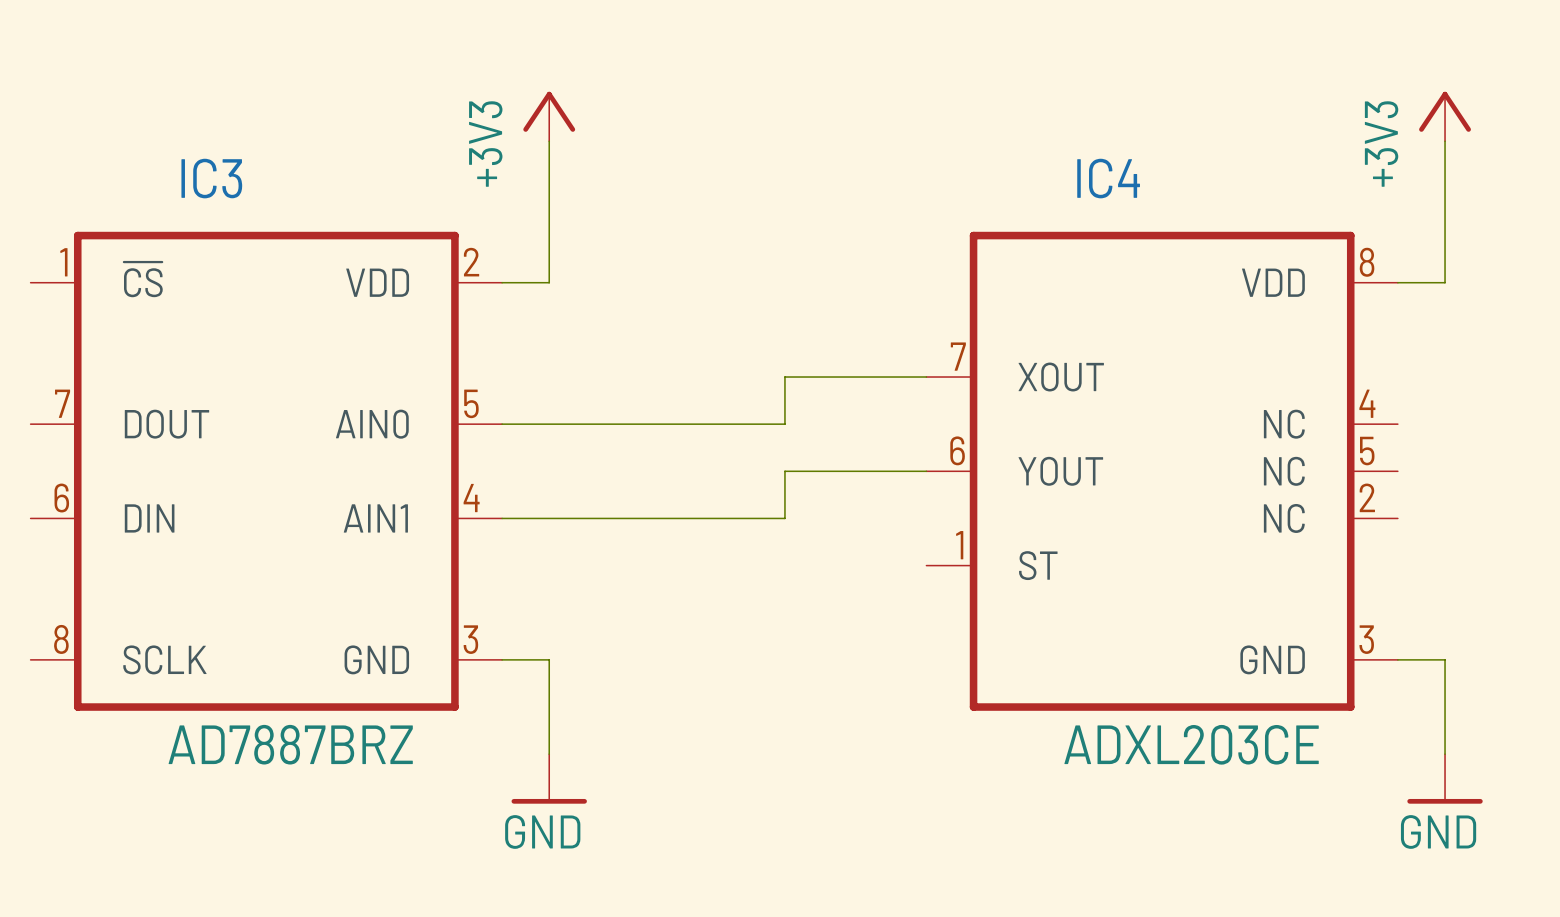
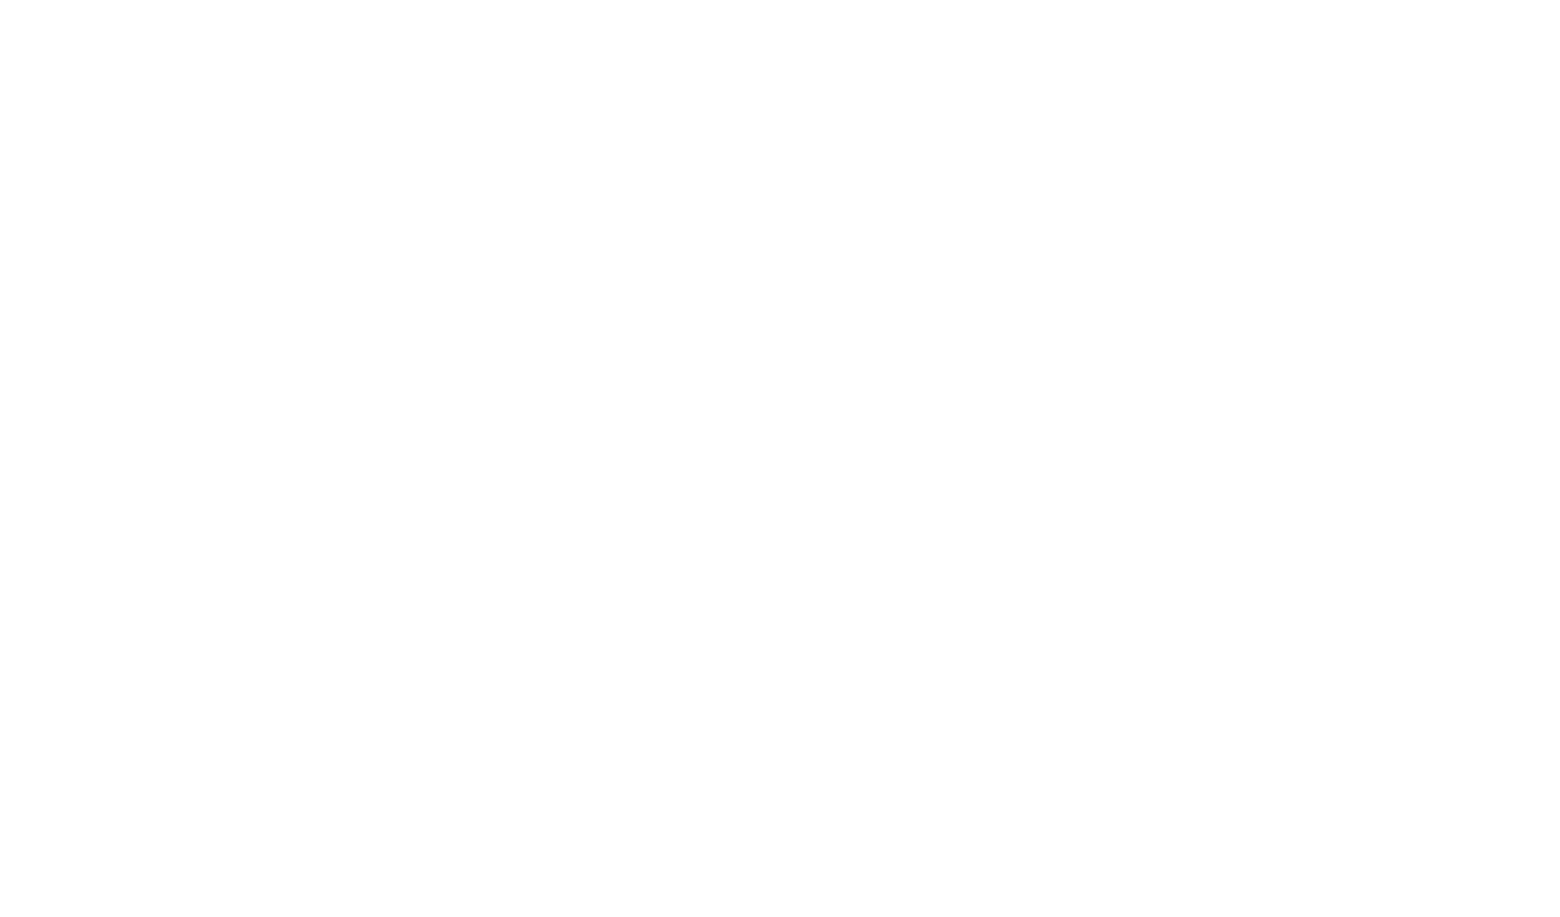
power symbol: +3V3 (549, 116) -> none
power symbol: +3V3 (1445, 116) -> none
wire: (549, 141) (549, 282) (502, 282) -> none
wire: (1445, 141) (1445, 282) (1397, 282) -> none
wire: (926, 377) (784, 377) (784, 424) (502, 424) -> none
IC3: AD7887BRZ (266, 471) -> none
wire: (926, 471) (784, 471) (784, 518) (502, 518) -> none
IC4: ADXL203CE (1162, 471) -> none
wire: (502, 659) (549, 659) (549, 754) -> none
wire: (1397, 659) (1445, 659) (1445, 754) -> none
power symbol: GND (549, 778) -> none
power symbol: GND (1445, 778) -> none

